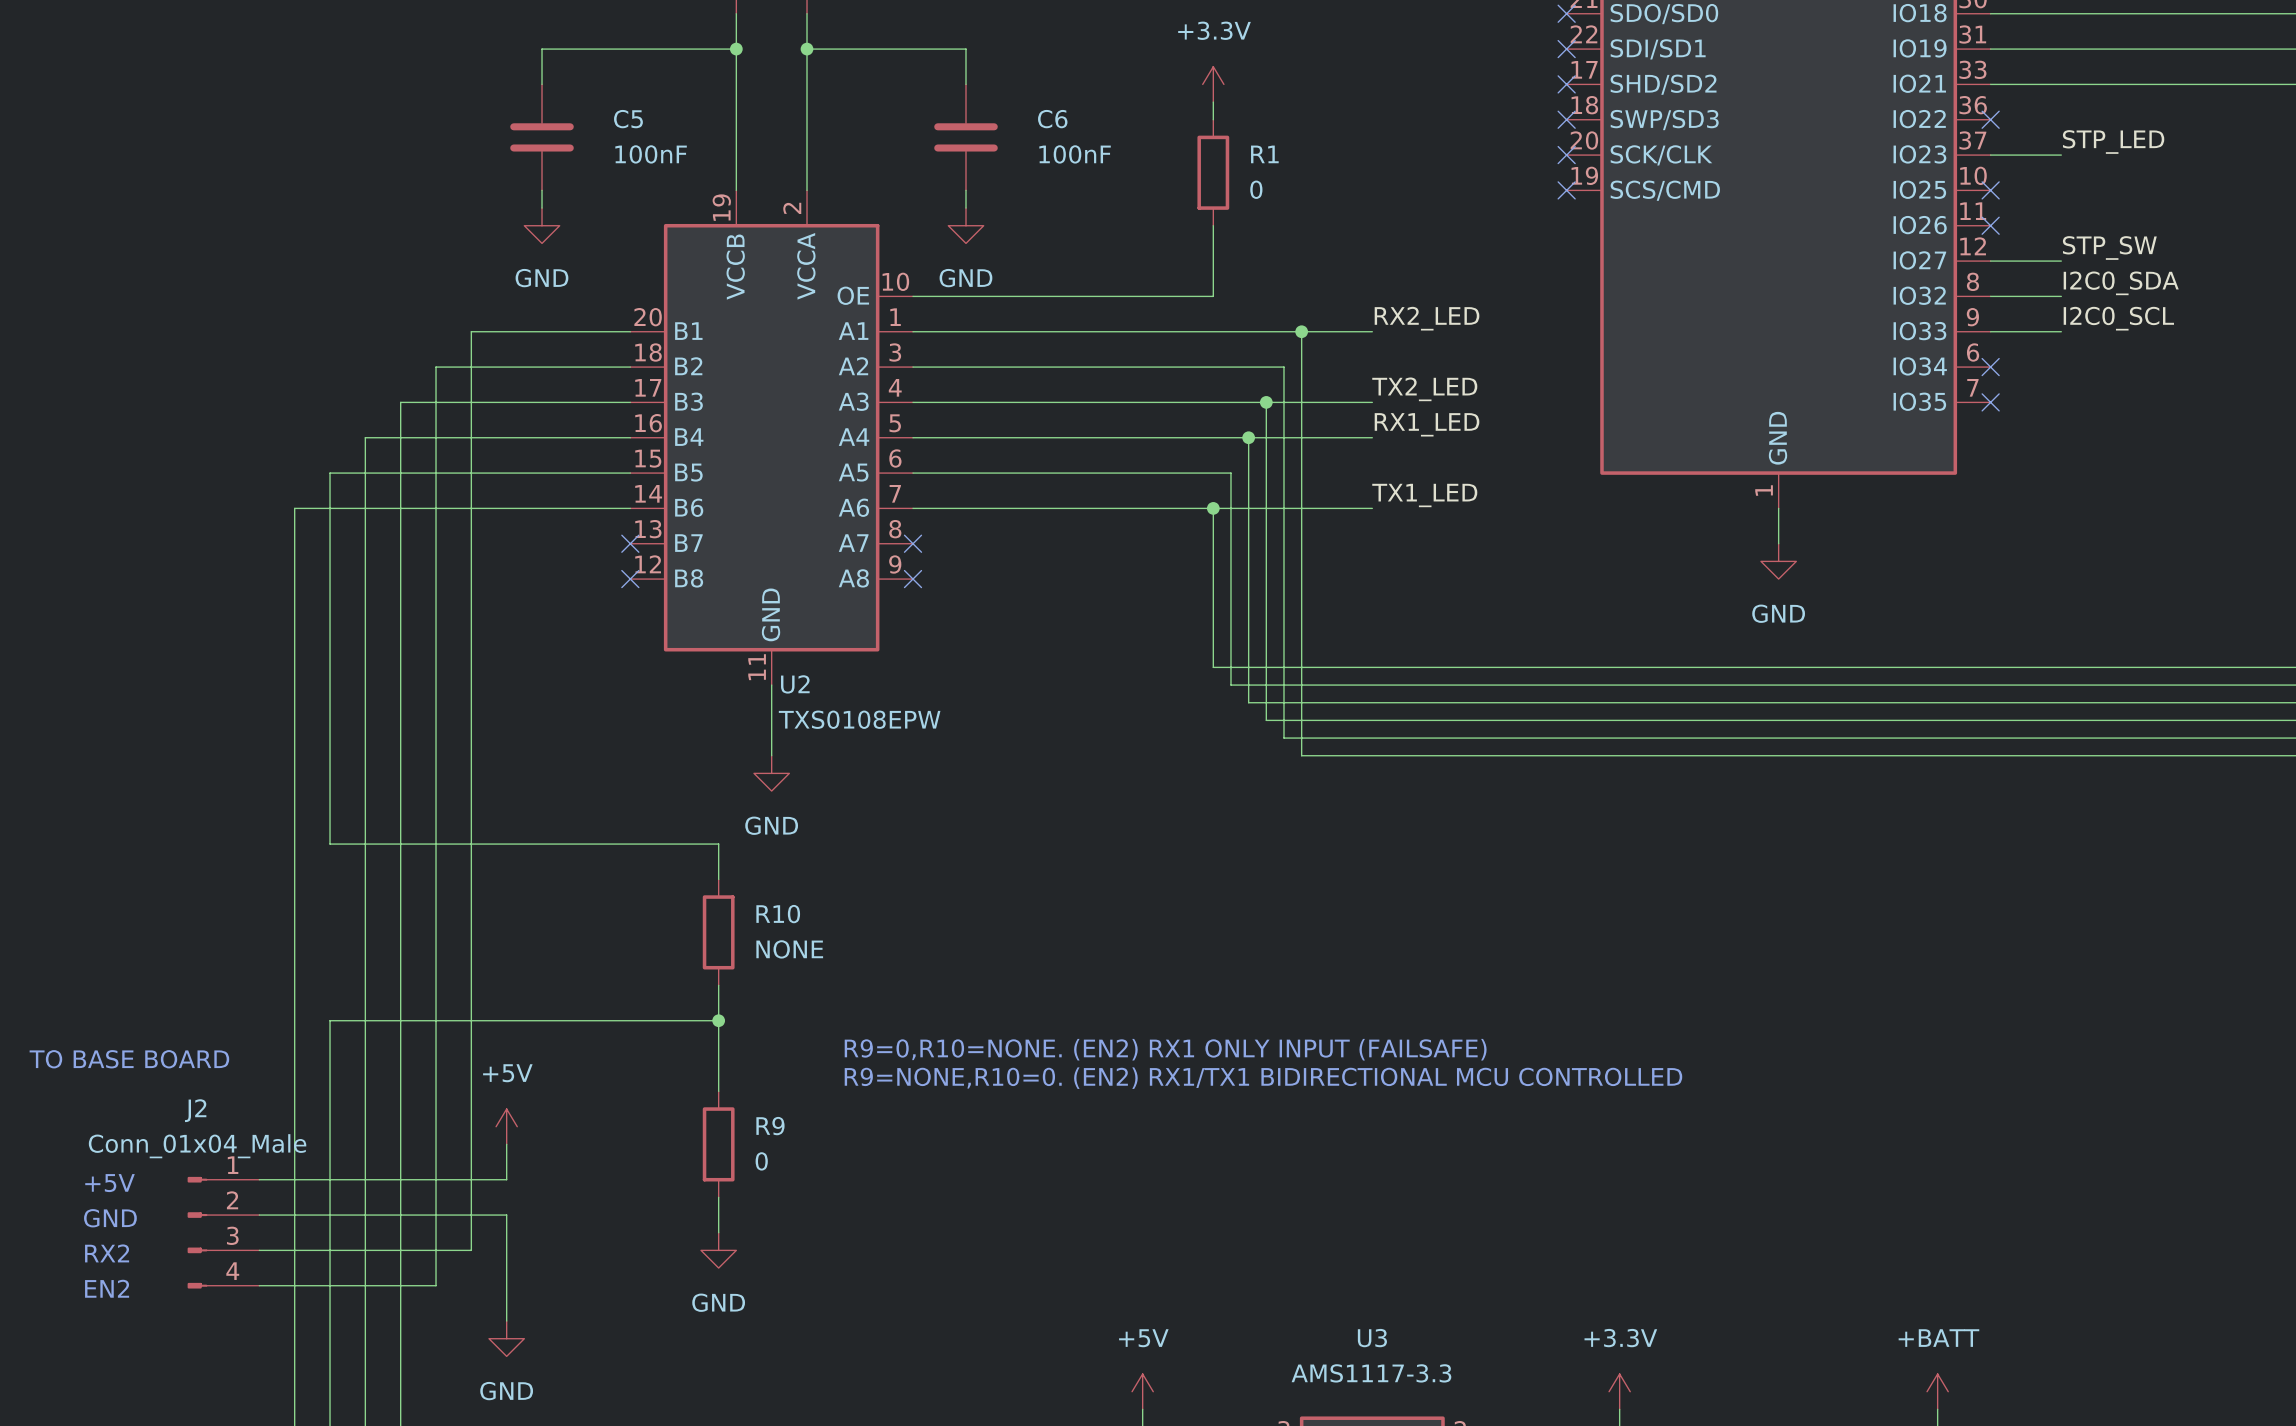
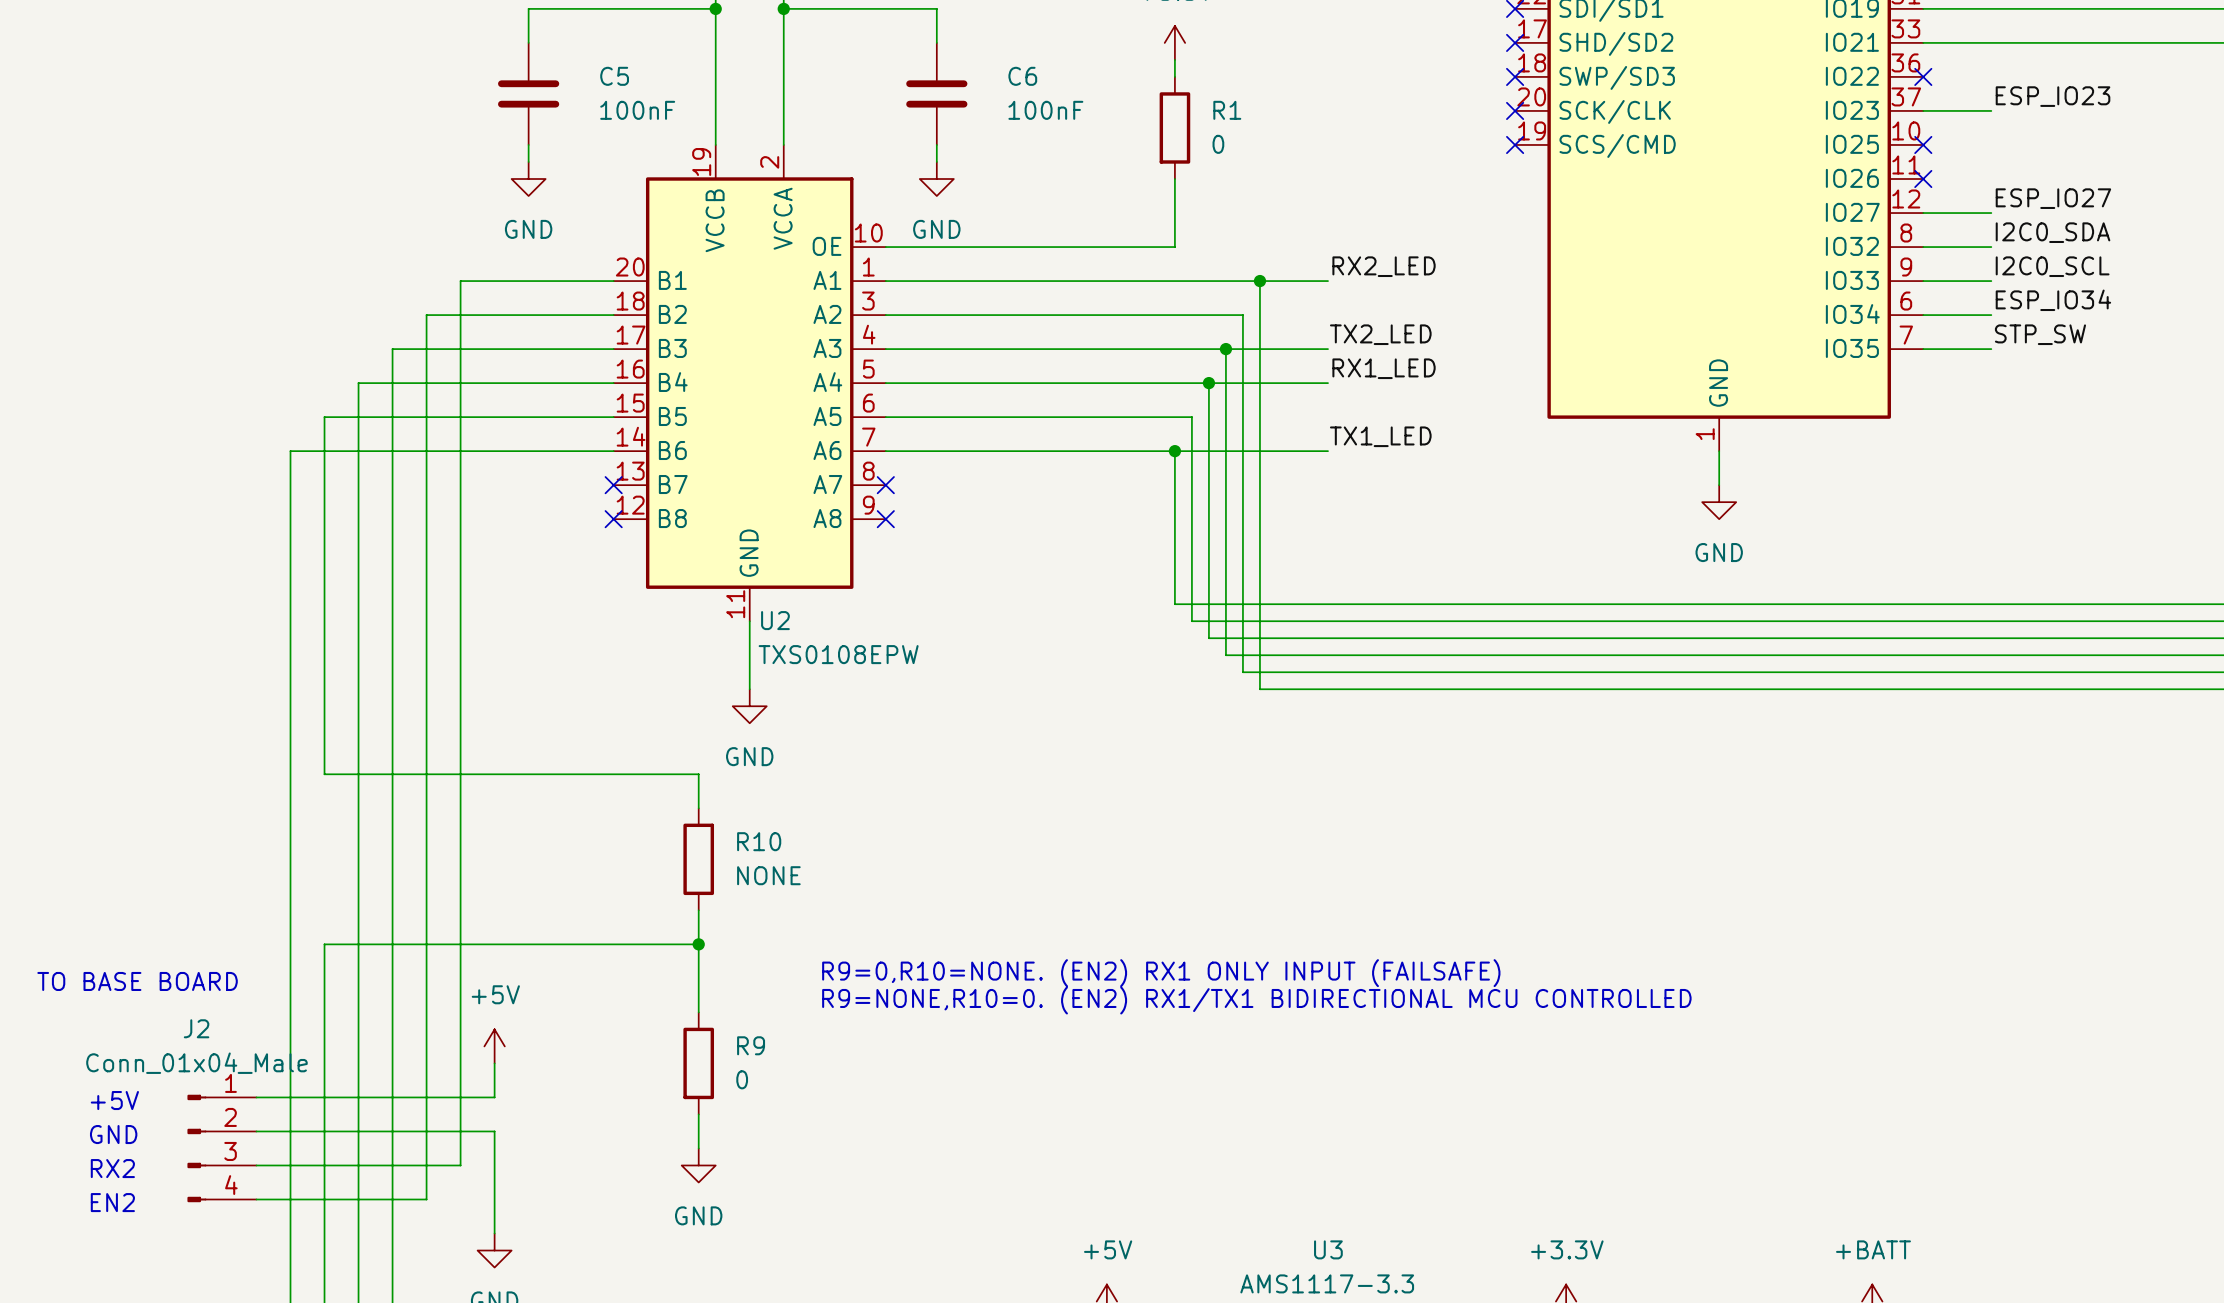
label: STP_LED (2113, 142) -> ESP_IO23 (2053, 96)
label: STP_SW (2109, 248) -> ESP_IO27 (2053, 198)
label: none -> ESP_IO34 (2053, 300)
wire: none -> (1923, 315) (1991, 315)
no-connect mark: (1990, 367) -> none
label: none -> STP_SW (2040, 334)
wire: none -> (1923, 349) (1991, 349)
no-connect mark: (1990, 402) -> none

